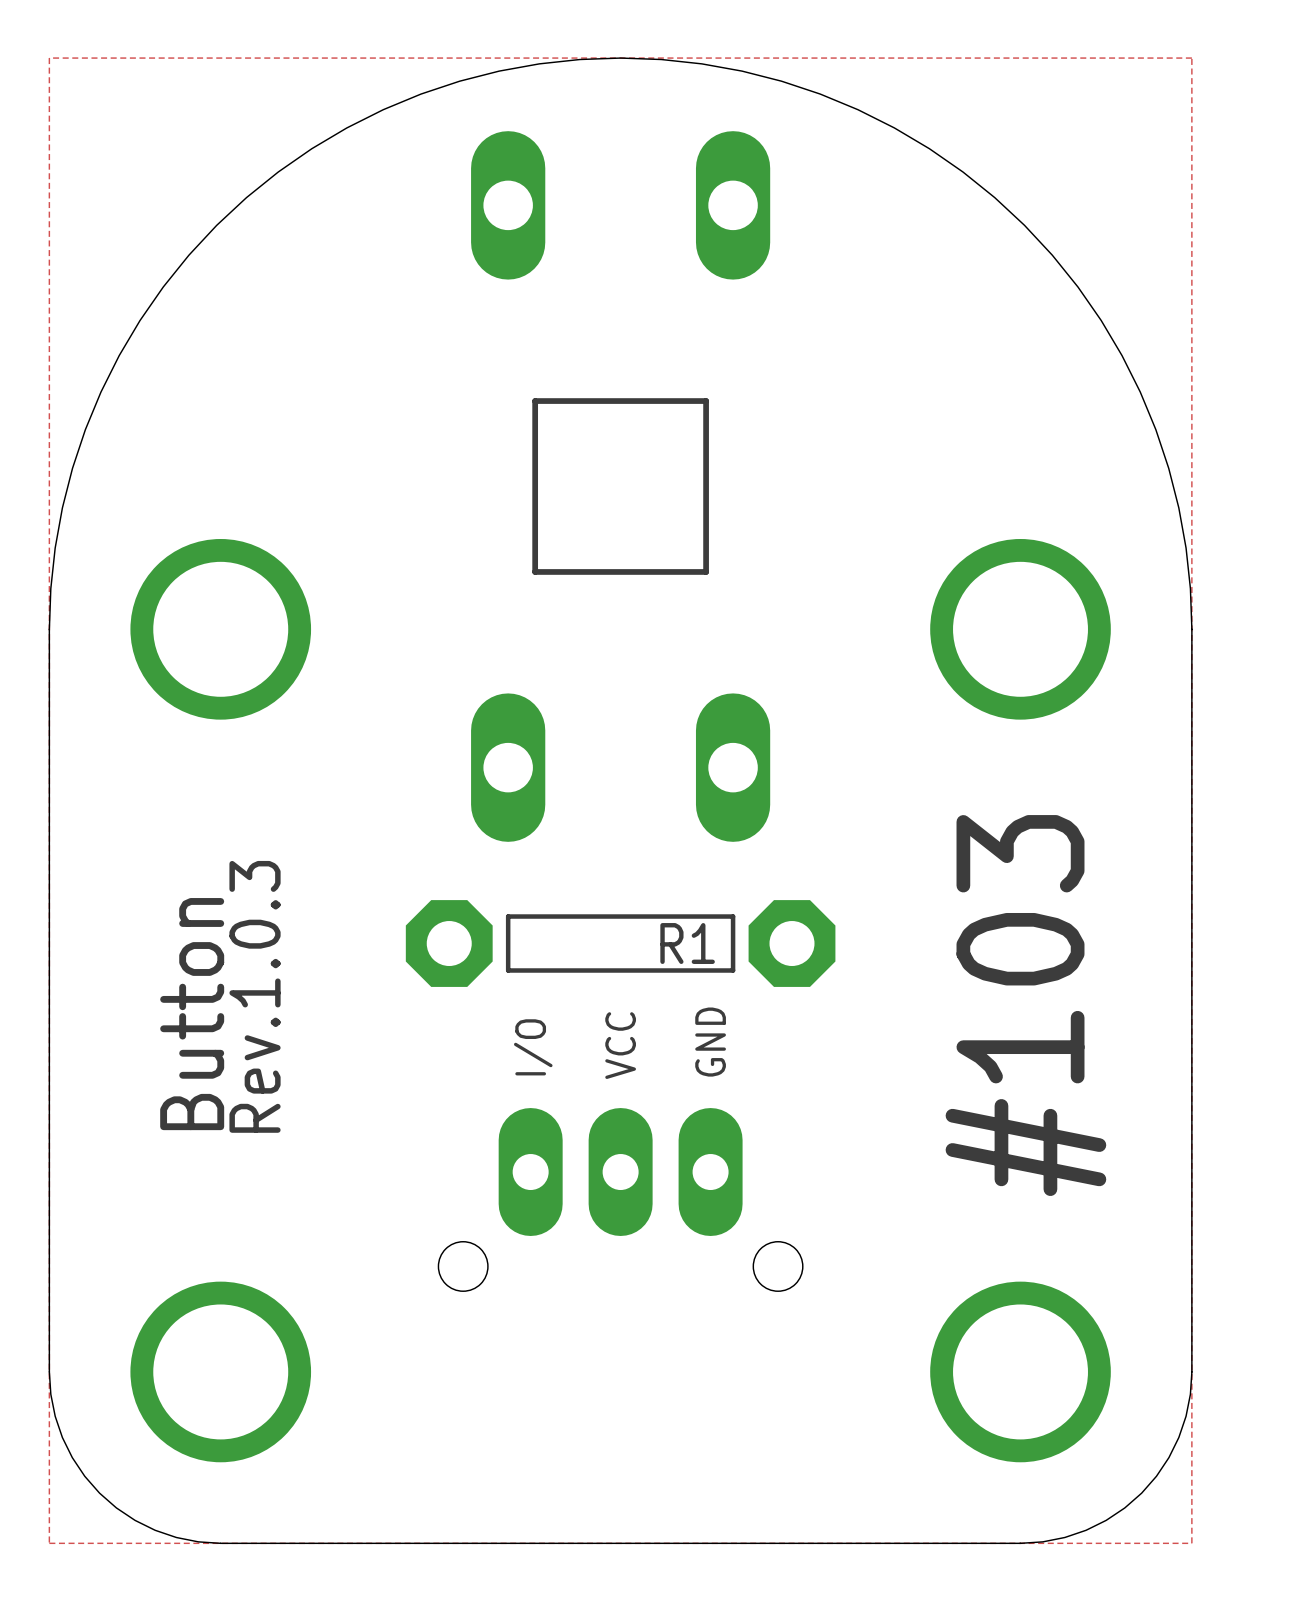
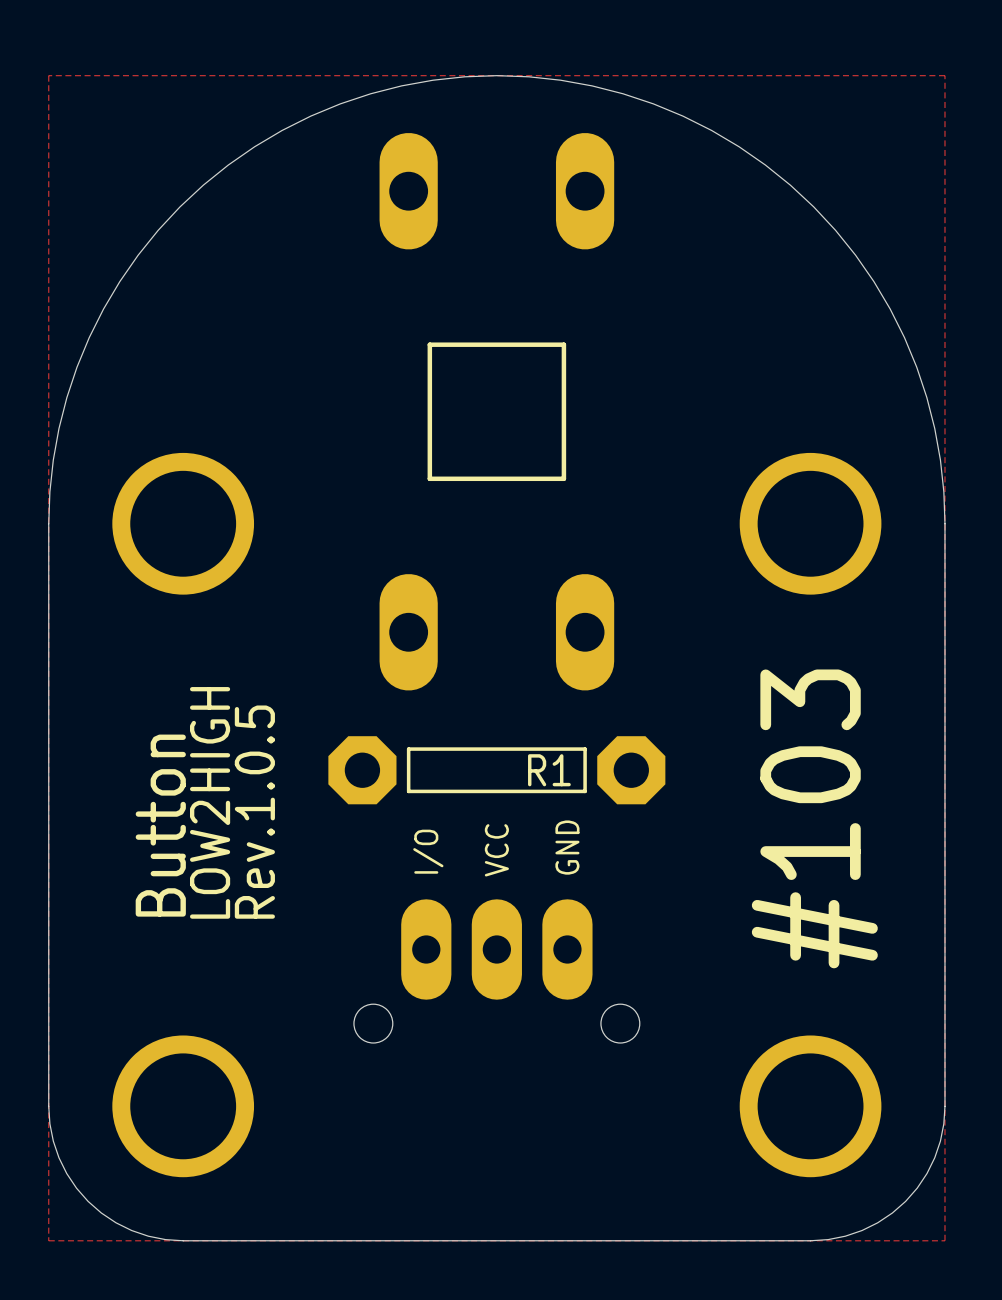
text: Rev.1.0.3 (255, 996) -> LOW2HIGH (210, 802)
text: none -> Rev.1.0.5 (254, 812)

